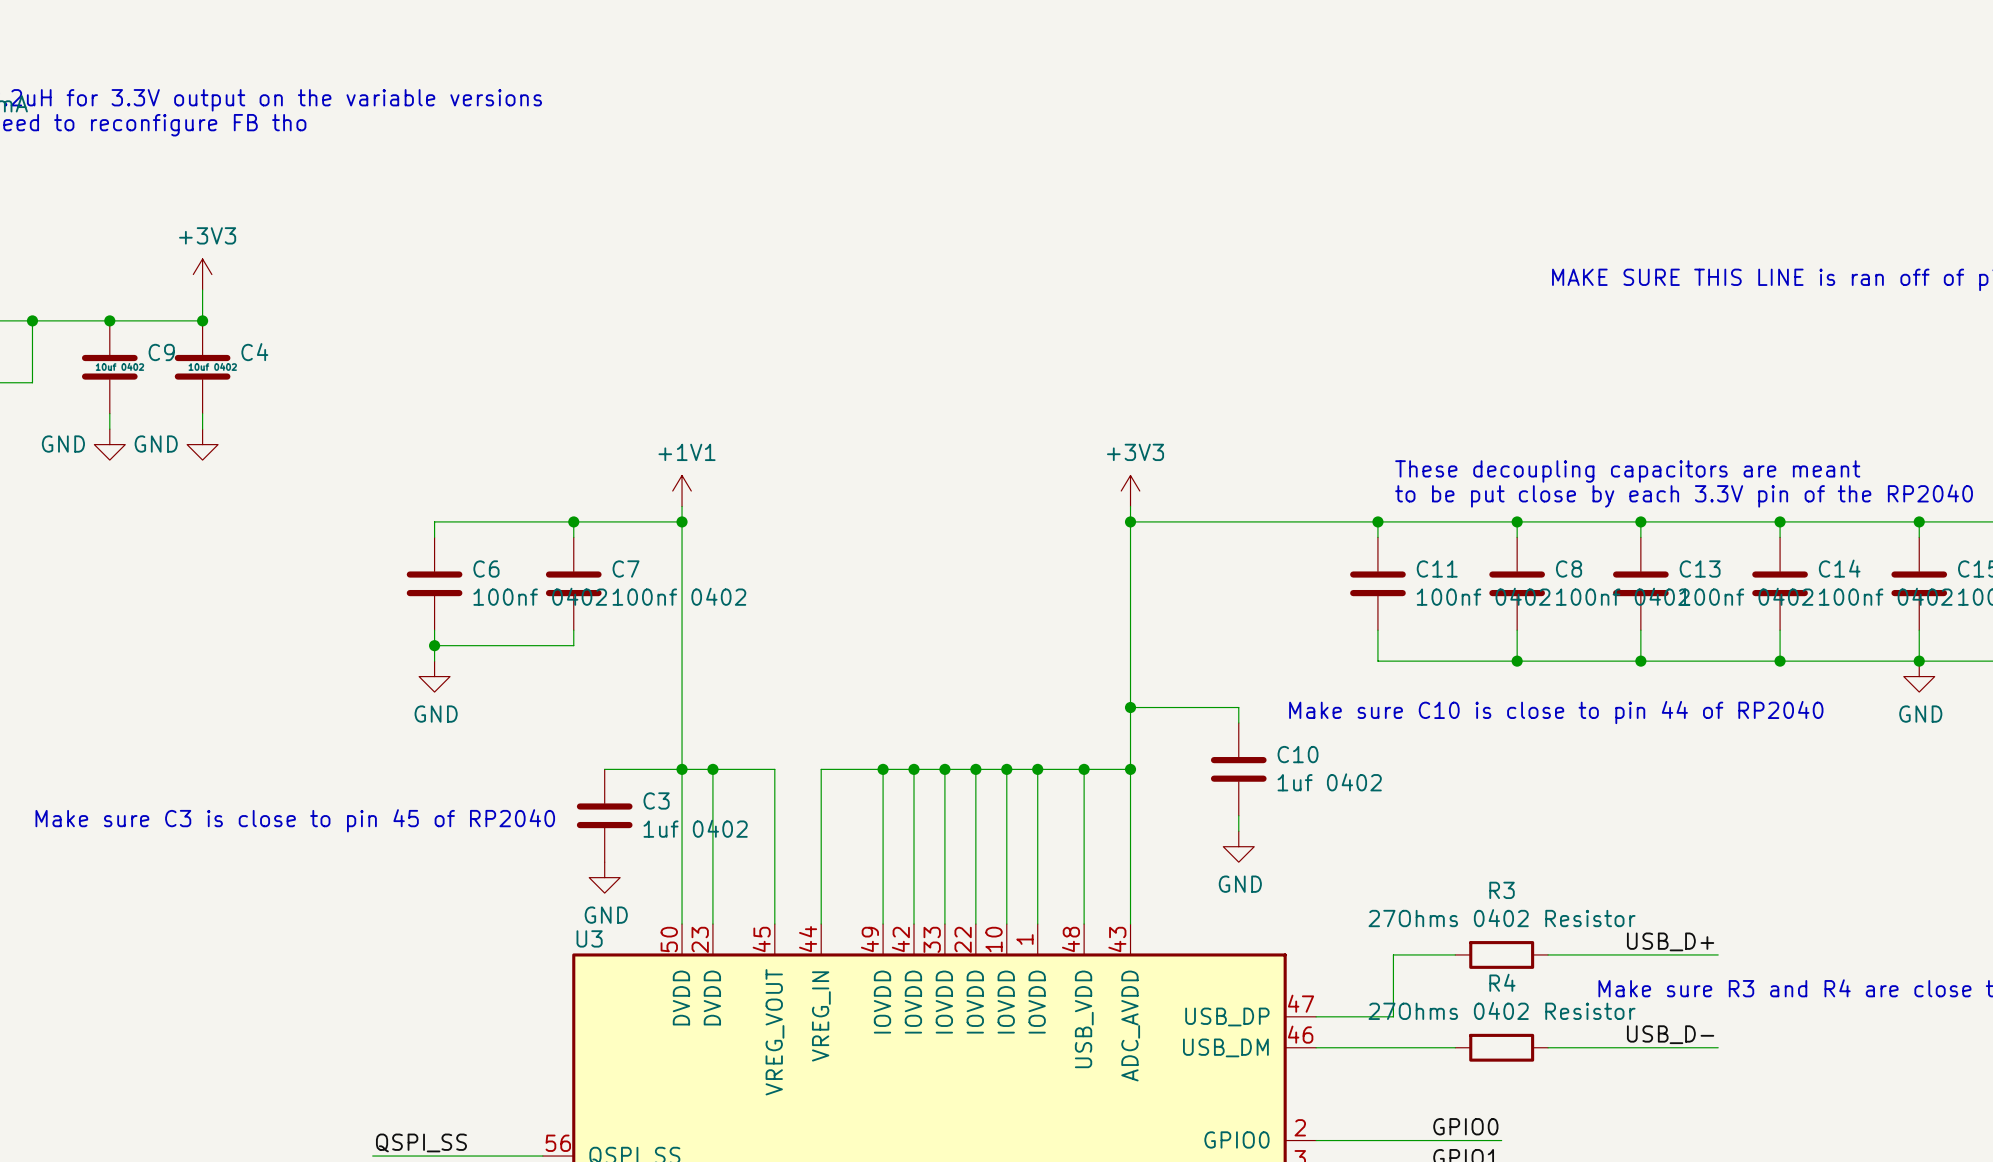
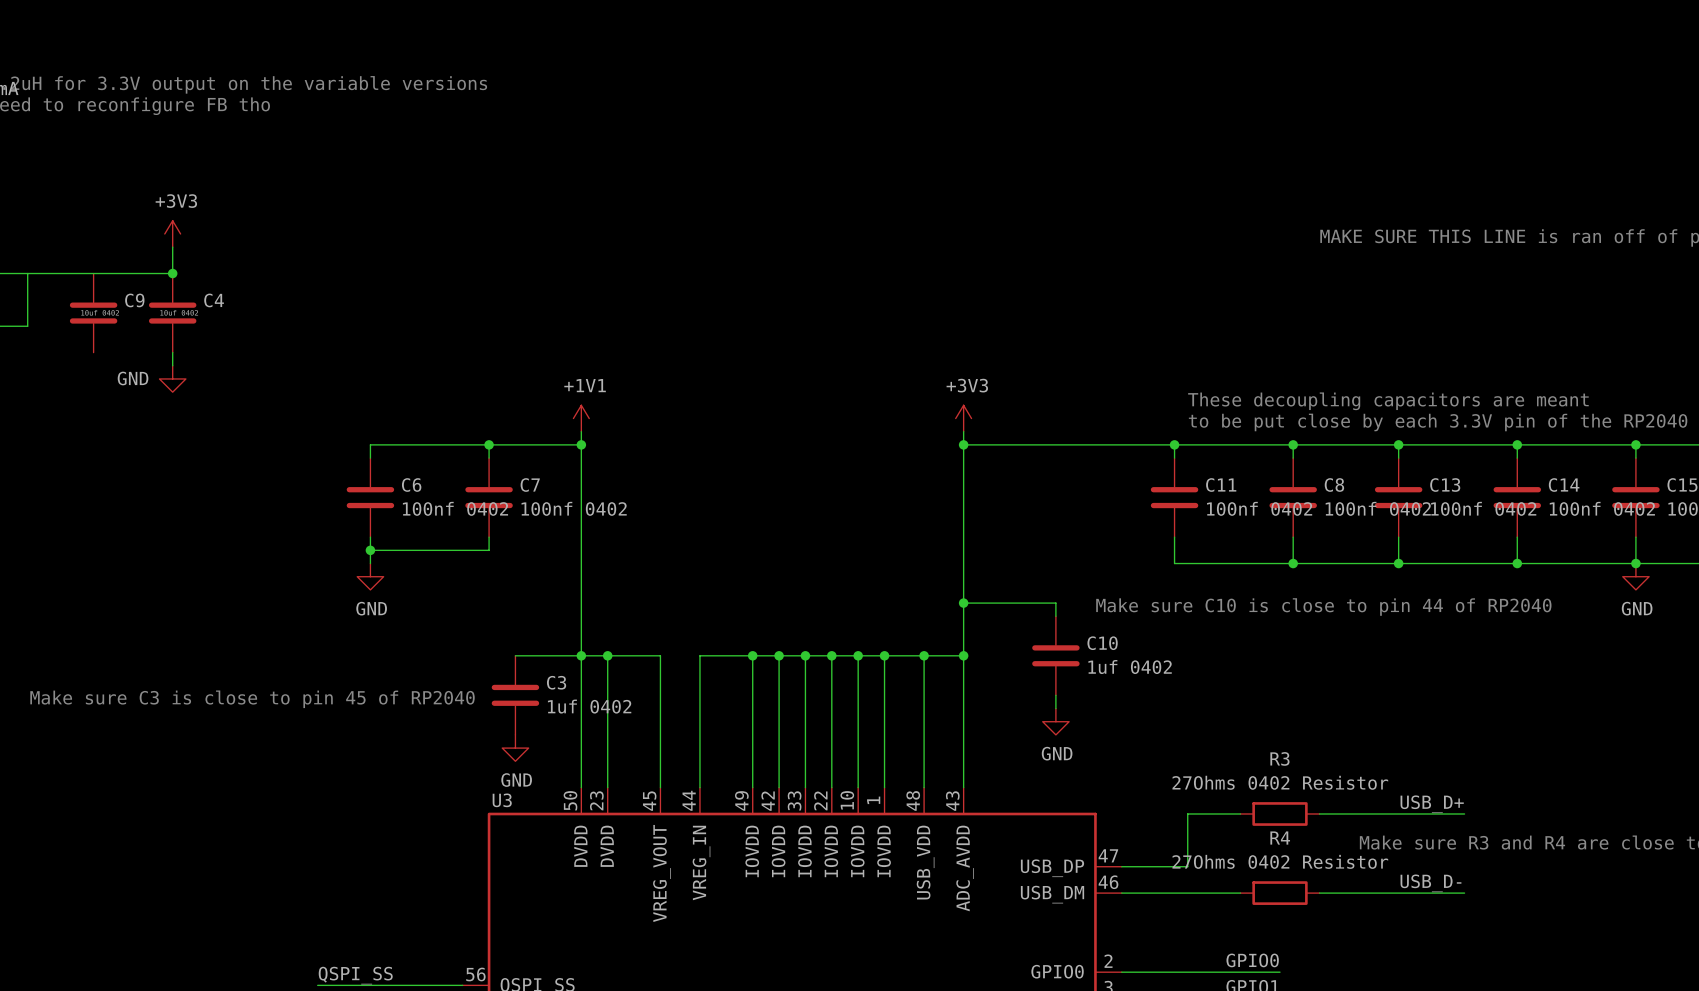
junction: (32, 320) -> none
junction: (109, 320) -> none
wire: (109, 413) (109, 429) -> none
power symbol: GND (109, 444) -> none

